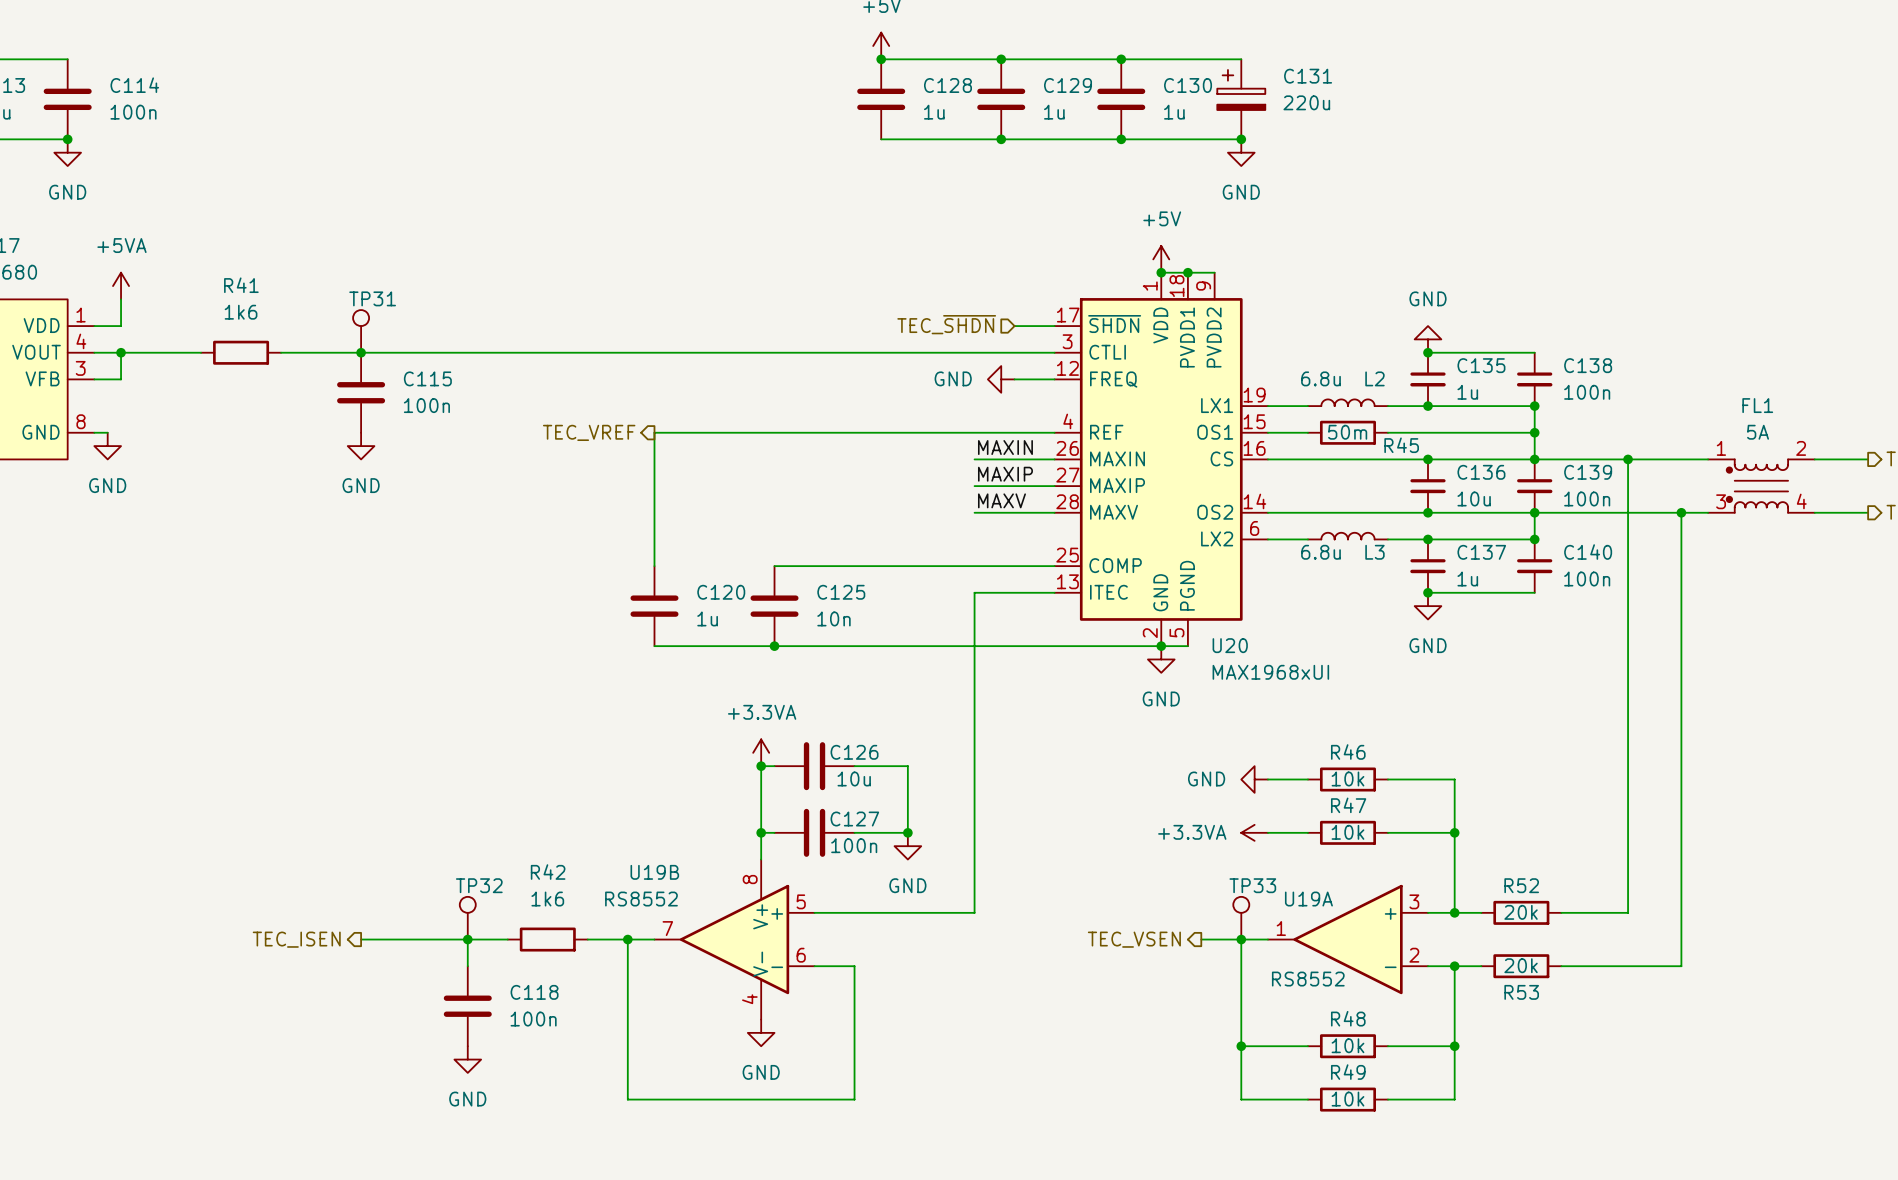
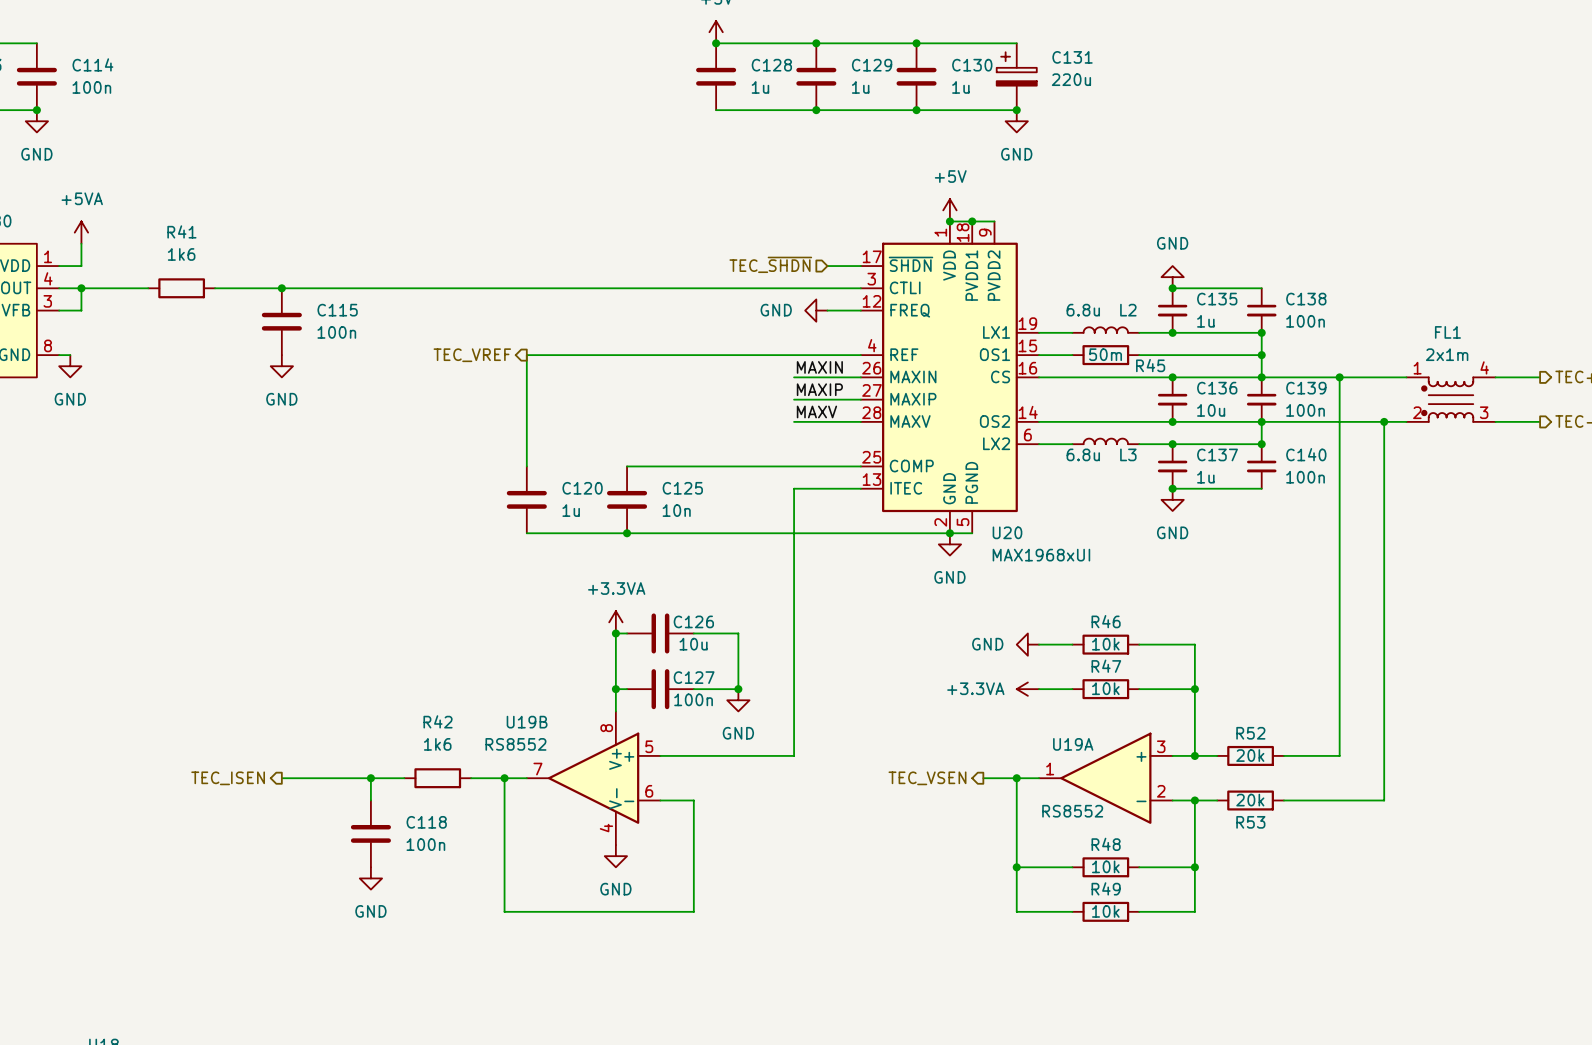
TP31: (361, 331) -> none
FL1 value: 5A (1758, 432) -> 2x1m (1447, 354)
FL1 symbol: [1708, 459, 1815, 513] -> [1406, 377, 1496, 422]
TP32: (467, 918) -> none
TP33: (1241, 918) -> none

